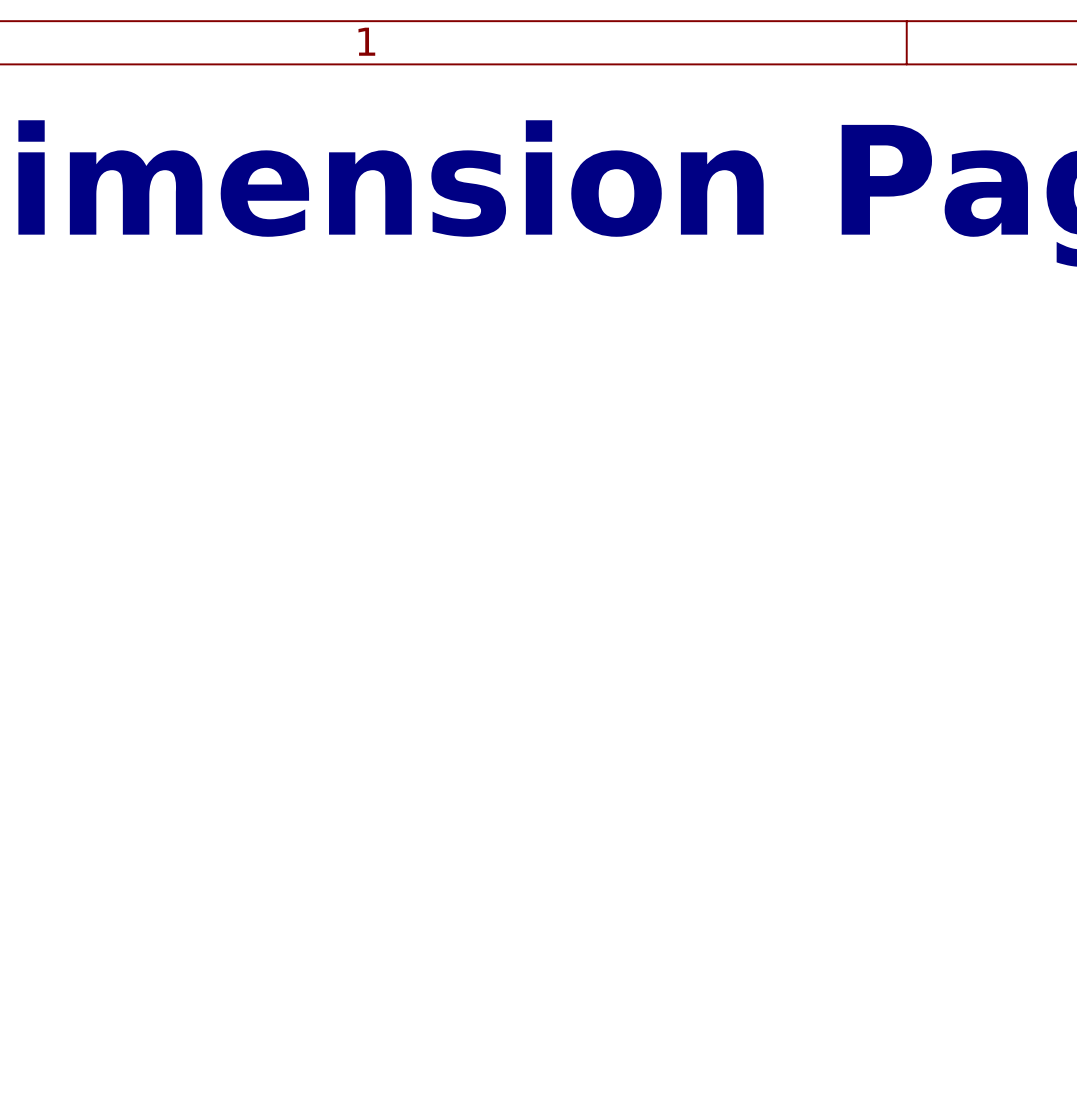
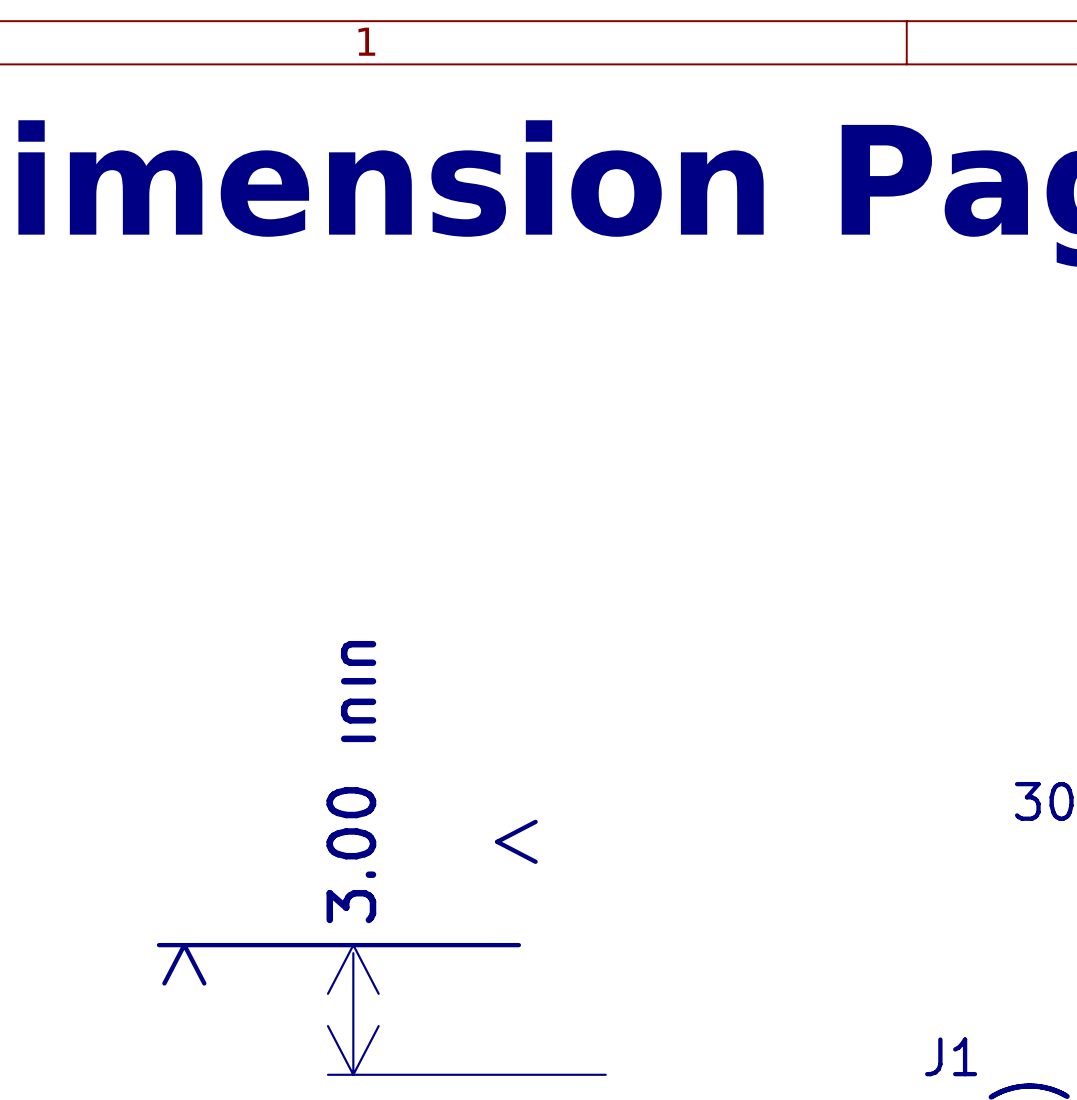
line: none -> (372, 644) (350, 644) (344, 650) (344, 656) (350, 662) (372, 662)
line: none -> (344, 681) (372, 681)
line: none -> (372, 701) (350, 701) (344, 708) (344, 714) (350, 720) (372, 720)
line: none -> (344, 738) (372, 738)
line: none -> (1017, 784) (1038, 784) (1026, 797) (1031, 797) (1036, 800) (1038, 803) (1036, 815) (1031, 818) (1022, 818) (1017, 815)
line: none -> (1059, 784) (1053, 790) (1051, 805) (1054, 815) (1063, 818) (1069, 812) (1071, 797) (1068, 787) (1059, 784)
line: none -> (346, 790) (356, 790) (368, 794) (372, 800) (370, 808) (356, 815) (346, 815) (333, 810) (329, 804) (331, 796) (346, 790)
line: none -> (535, 821) (497, 841) (535, 861)
line: none -> (346, 831) (331, 837) (329, 845) (333, 852) (346, 856) (356, 856) (370, 850) (372, 841) (368, 835) (356, 831) (346, 831)
line: none -> (368, 874) (372, 874)
line: none -> (329, 919) (329, 893) (346, 907) (346, 901) (350, 895) (354, 893) (368, 895) (372, 901) (372, 913) (368, 919)
line: none -> (159, 945) (518, 945)
line: none -> (353, 953) (353, 1074)
line: none -> (164, 983) (184, 945) (204, 983)
line: none -> (327, 993) (353, 945) (378, 993)
line: none -> (327, 1026) (353, 1074)
line: none -> (378, 1026) (353, 1074)
line: none -> (940, 1039) (938, 1069) (935, 1072) (927, 1074)
line: none -> (955, 1049) (965, 1039) (965, 1074)
line: none -> (327, 1074) (605, 1074)
line: none -> (955, 1074) (974, 1074)
line: none -> (1028, 1086) (1048, 1088) (1067, 1096)
line: none -> (1029, 1086) (1009, 1088) (991, 1097)

